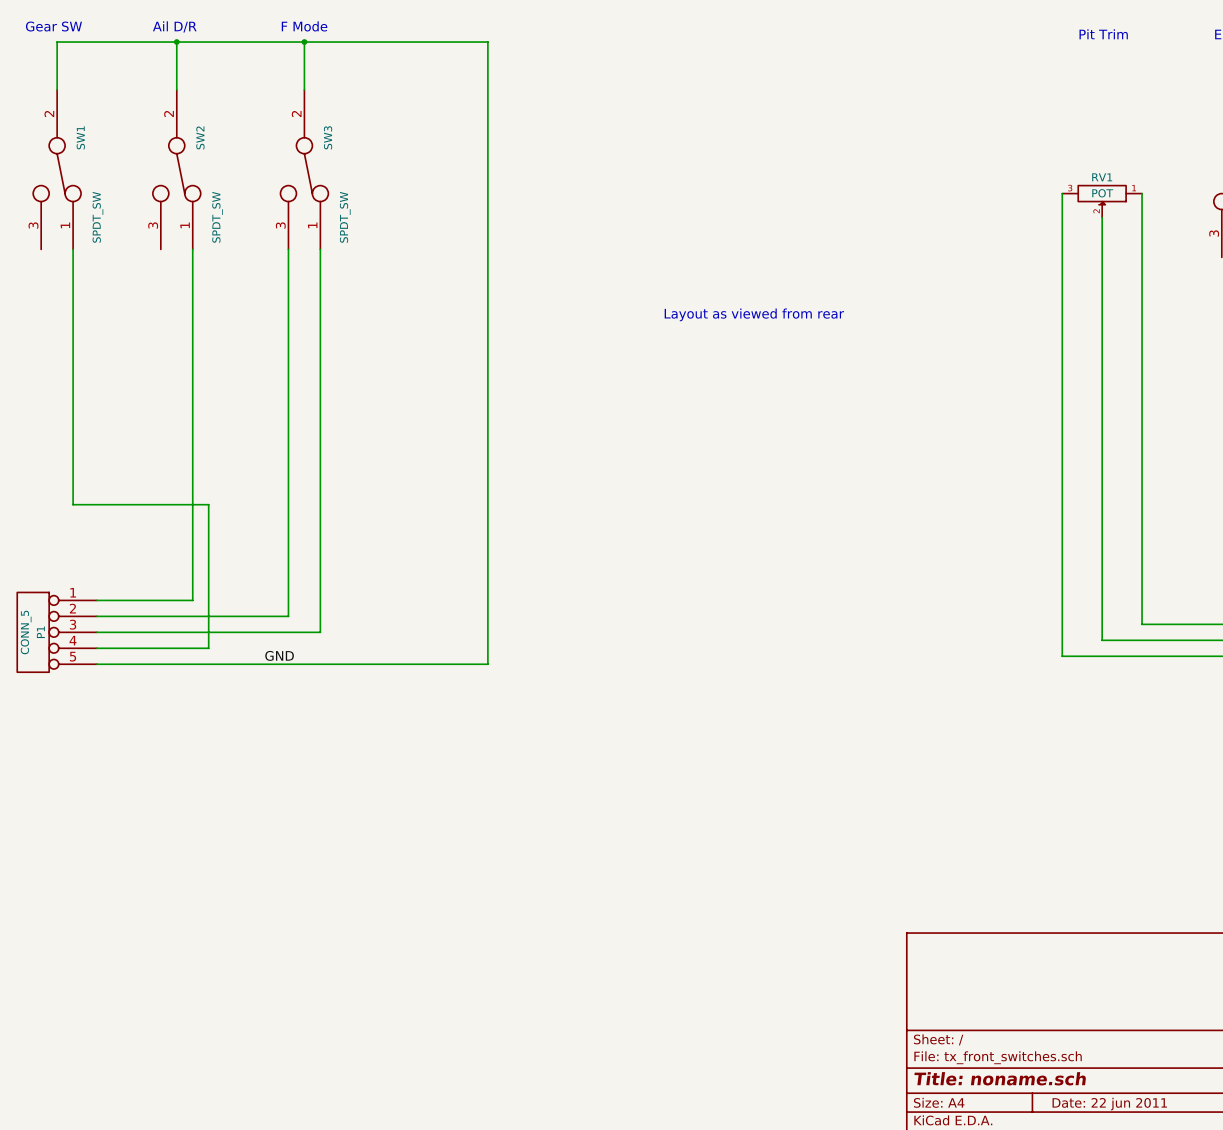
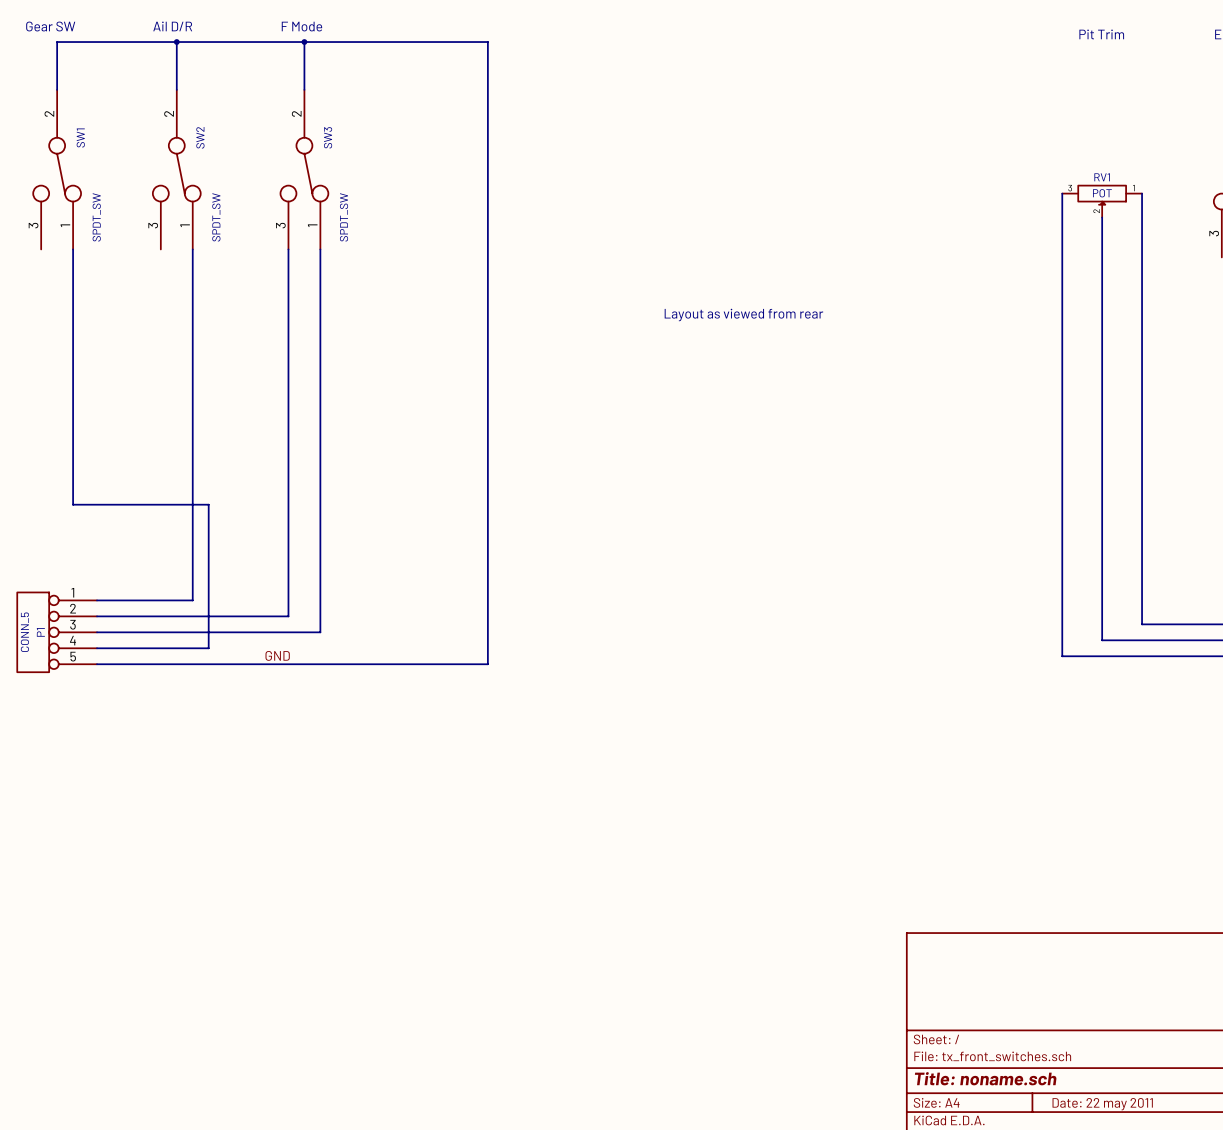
title block: Date: 22 jun 2011 (1109, 1104) -> Date: 22 may 2011 (1102, 1104)

